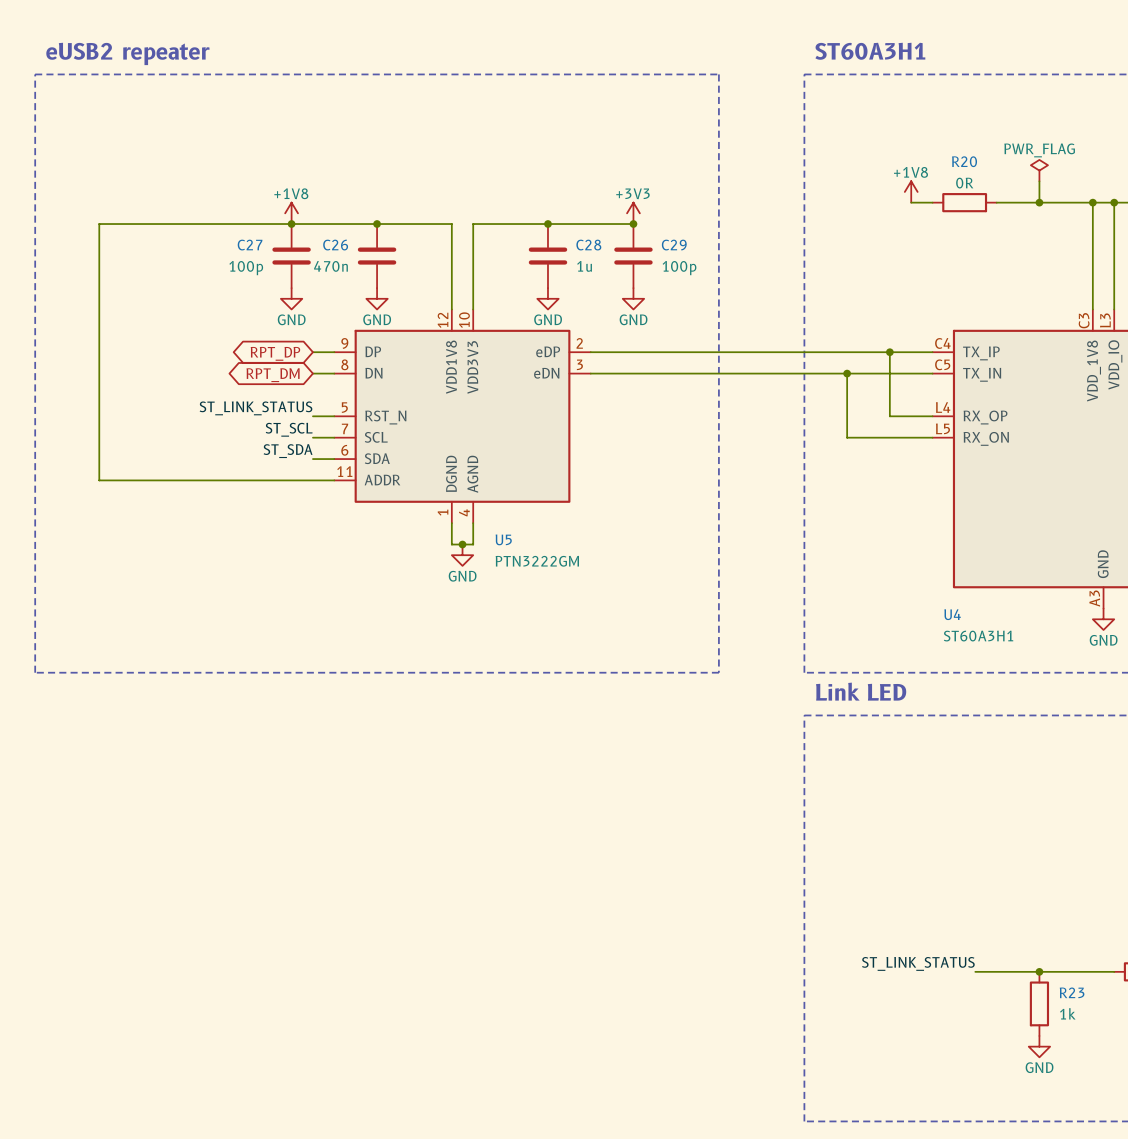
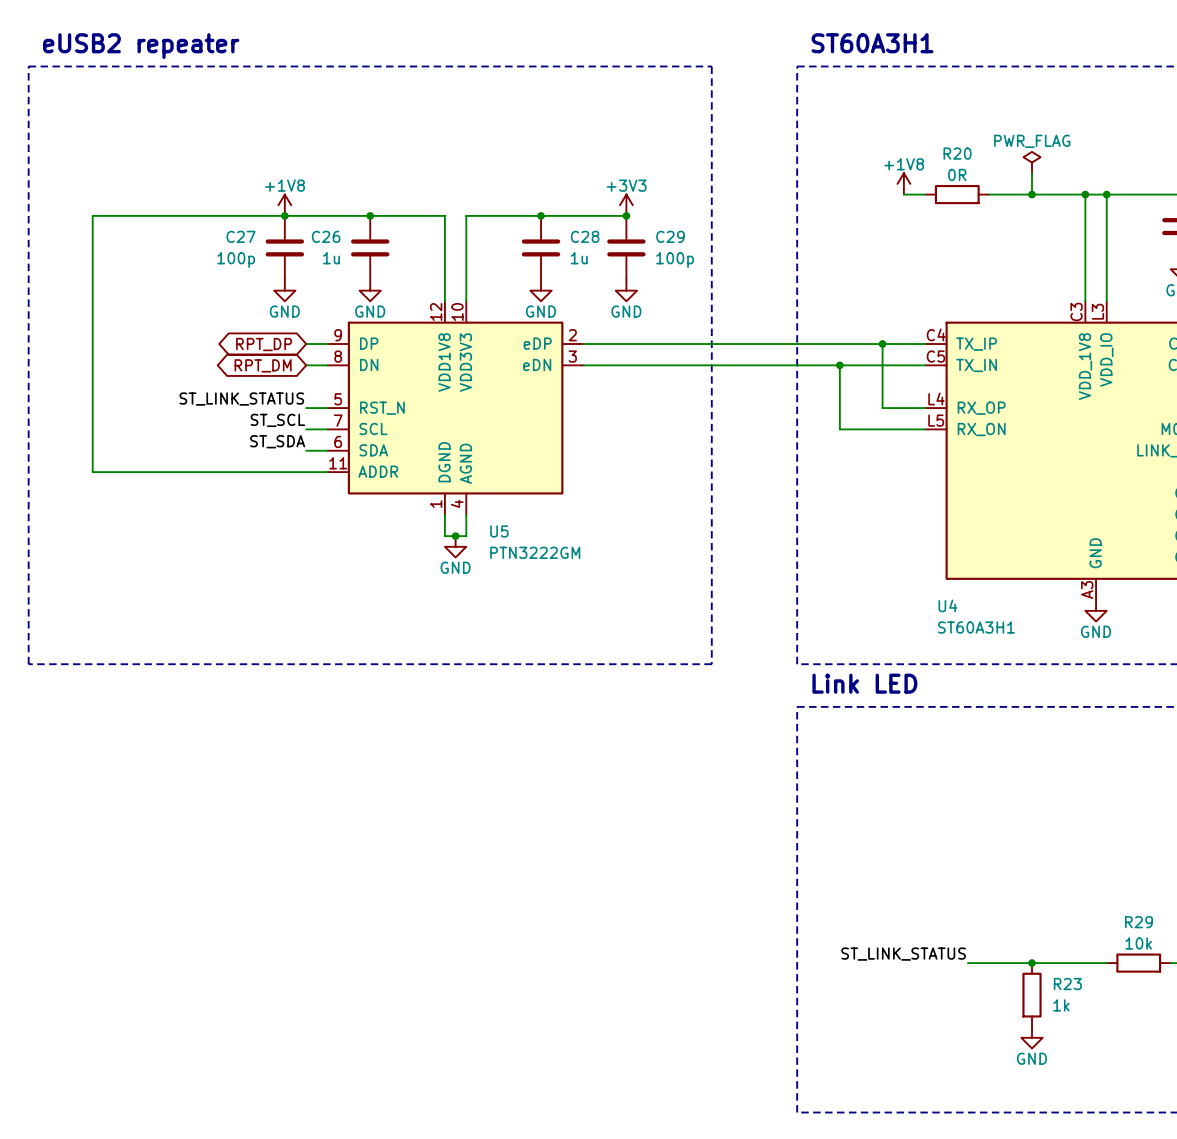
C26 value: 470n (331, 266) -> 1u (331, 258)

